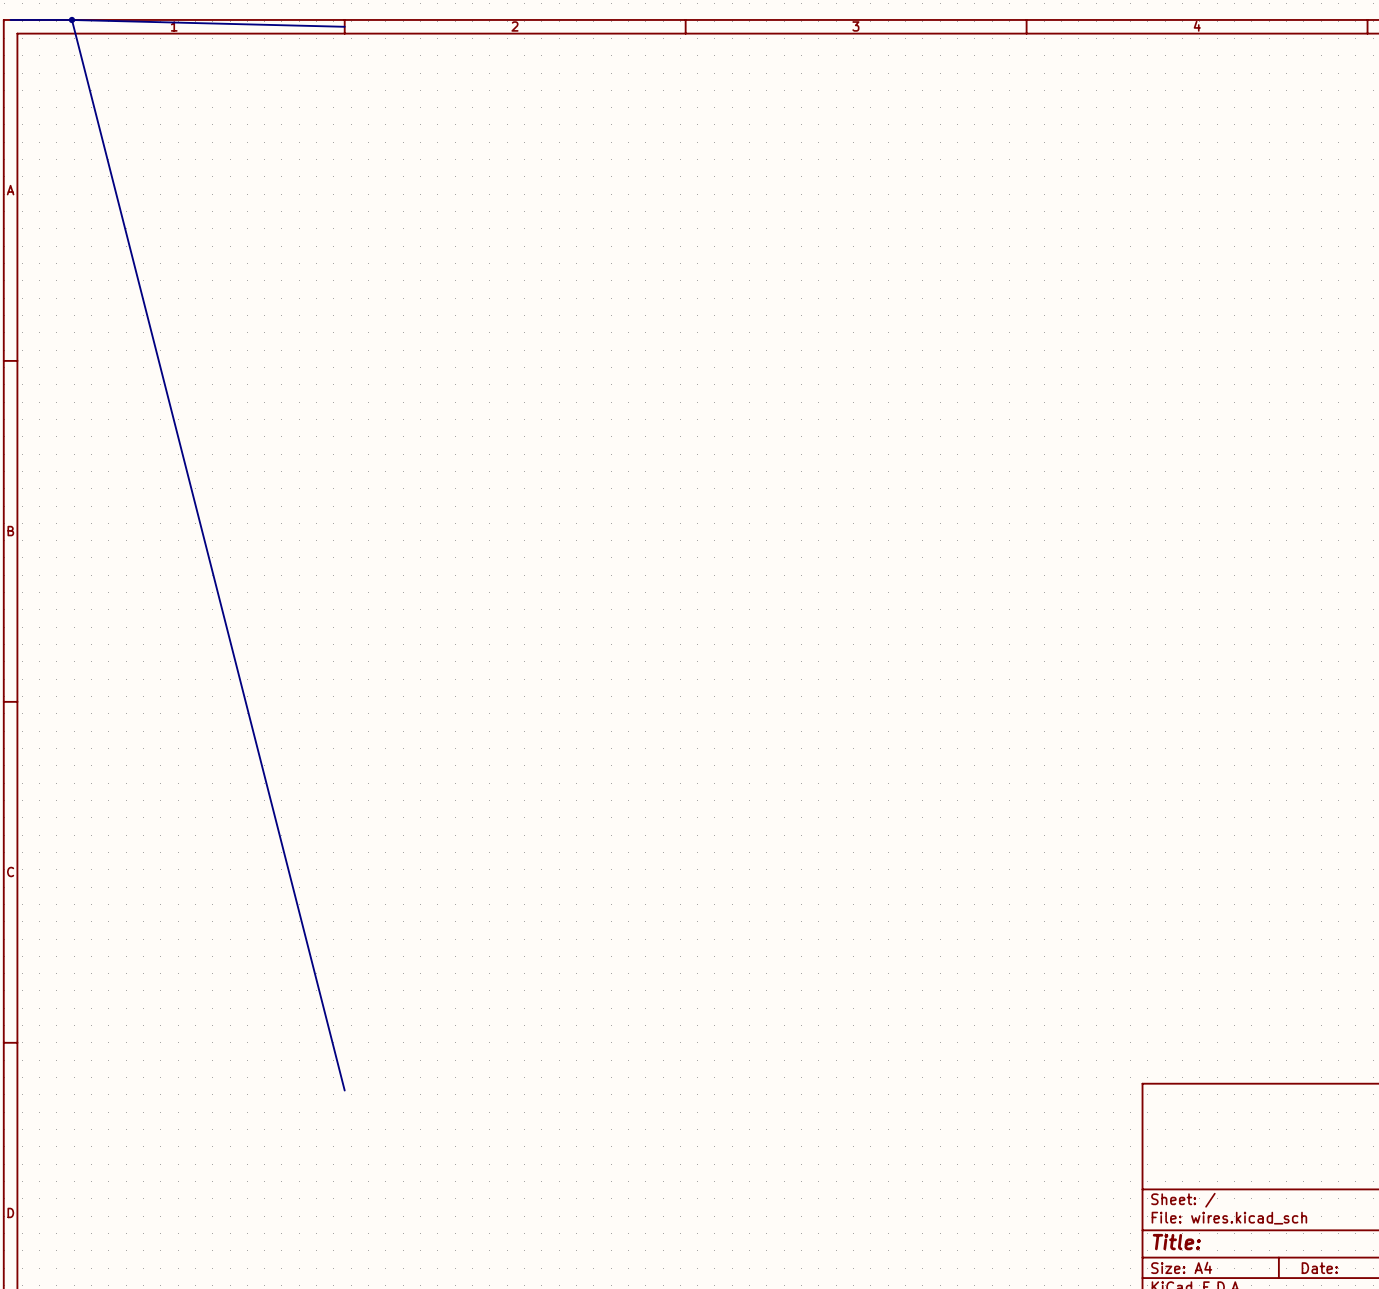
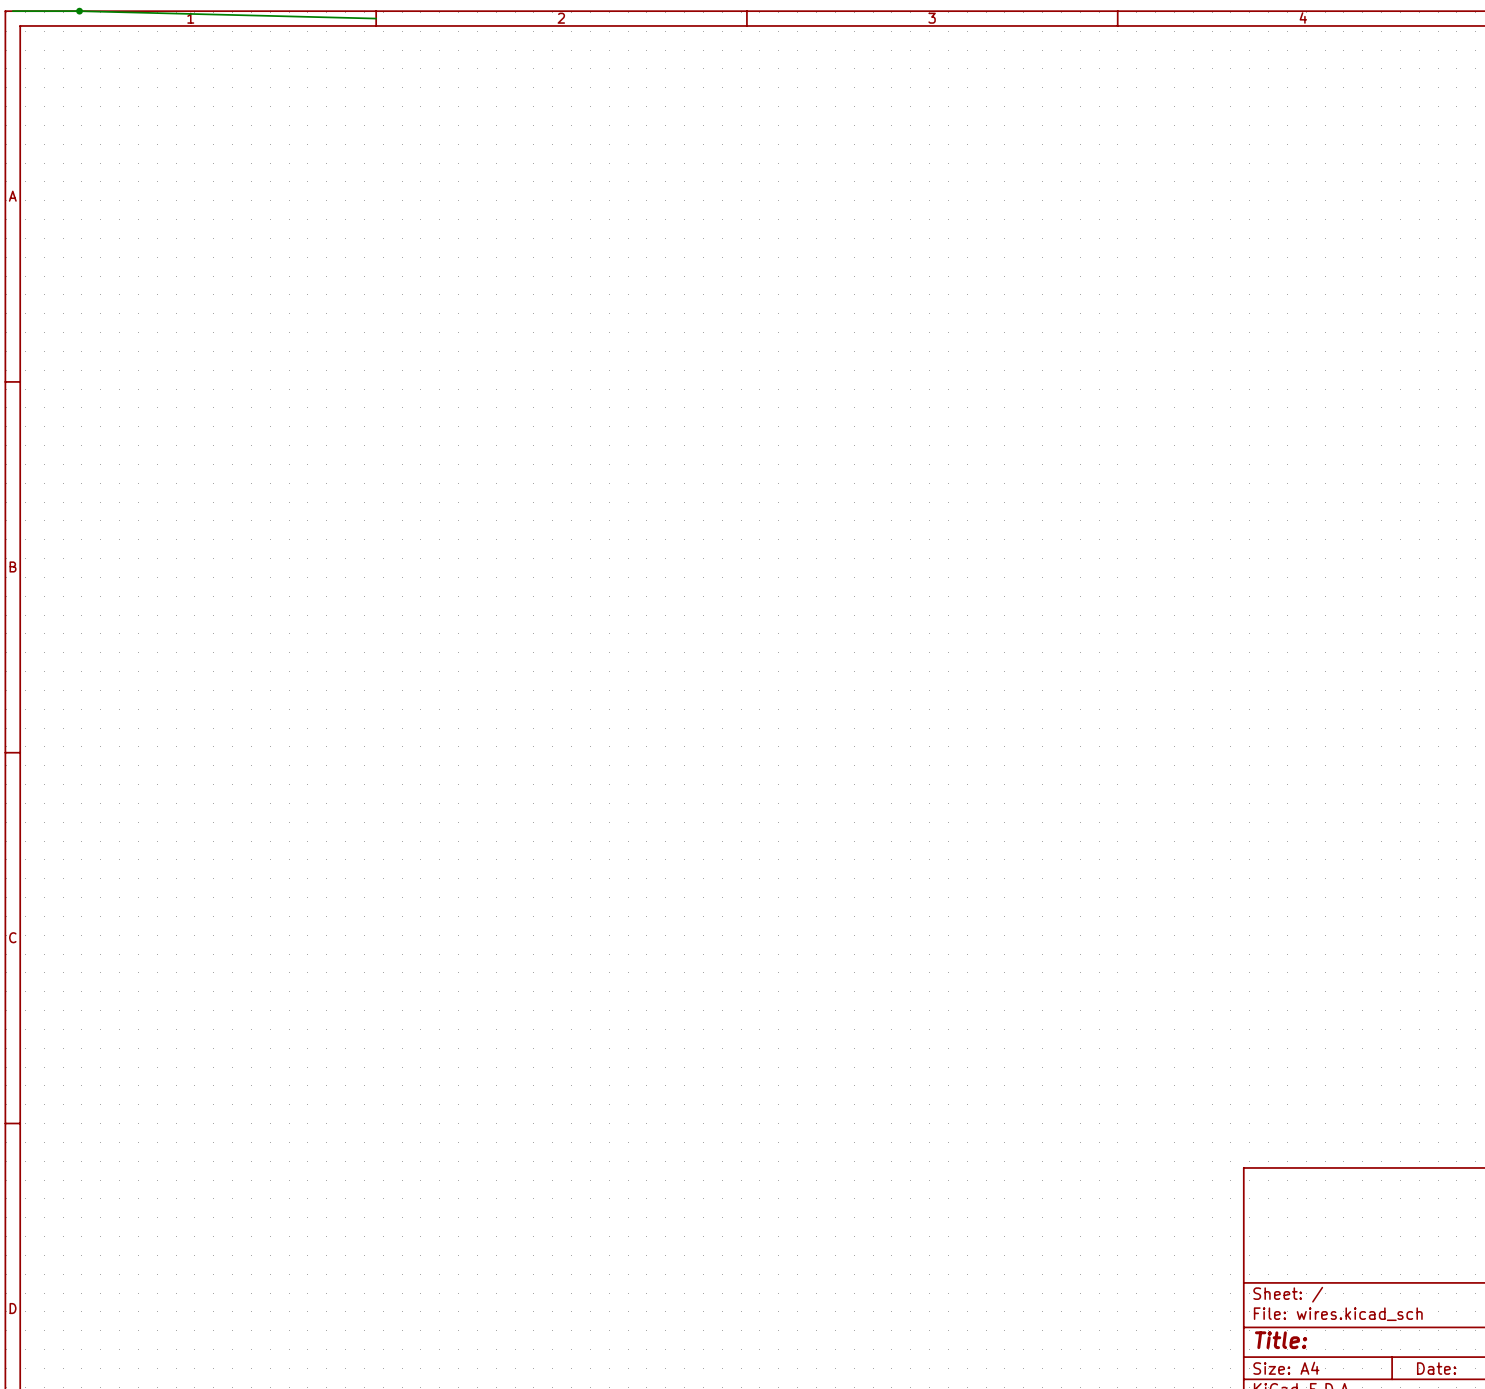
wire: (71, 19) (344, 1090) -> none

